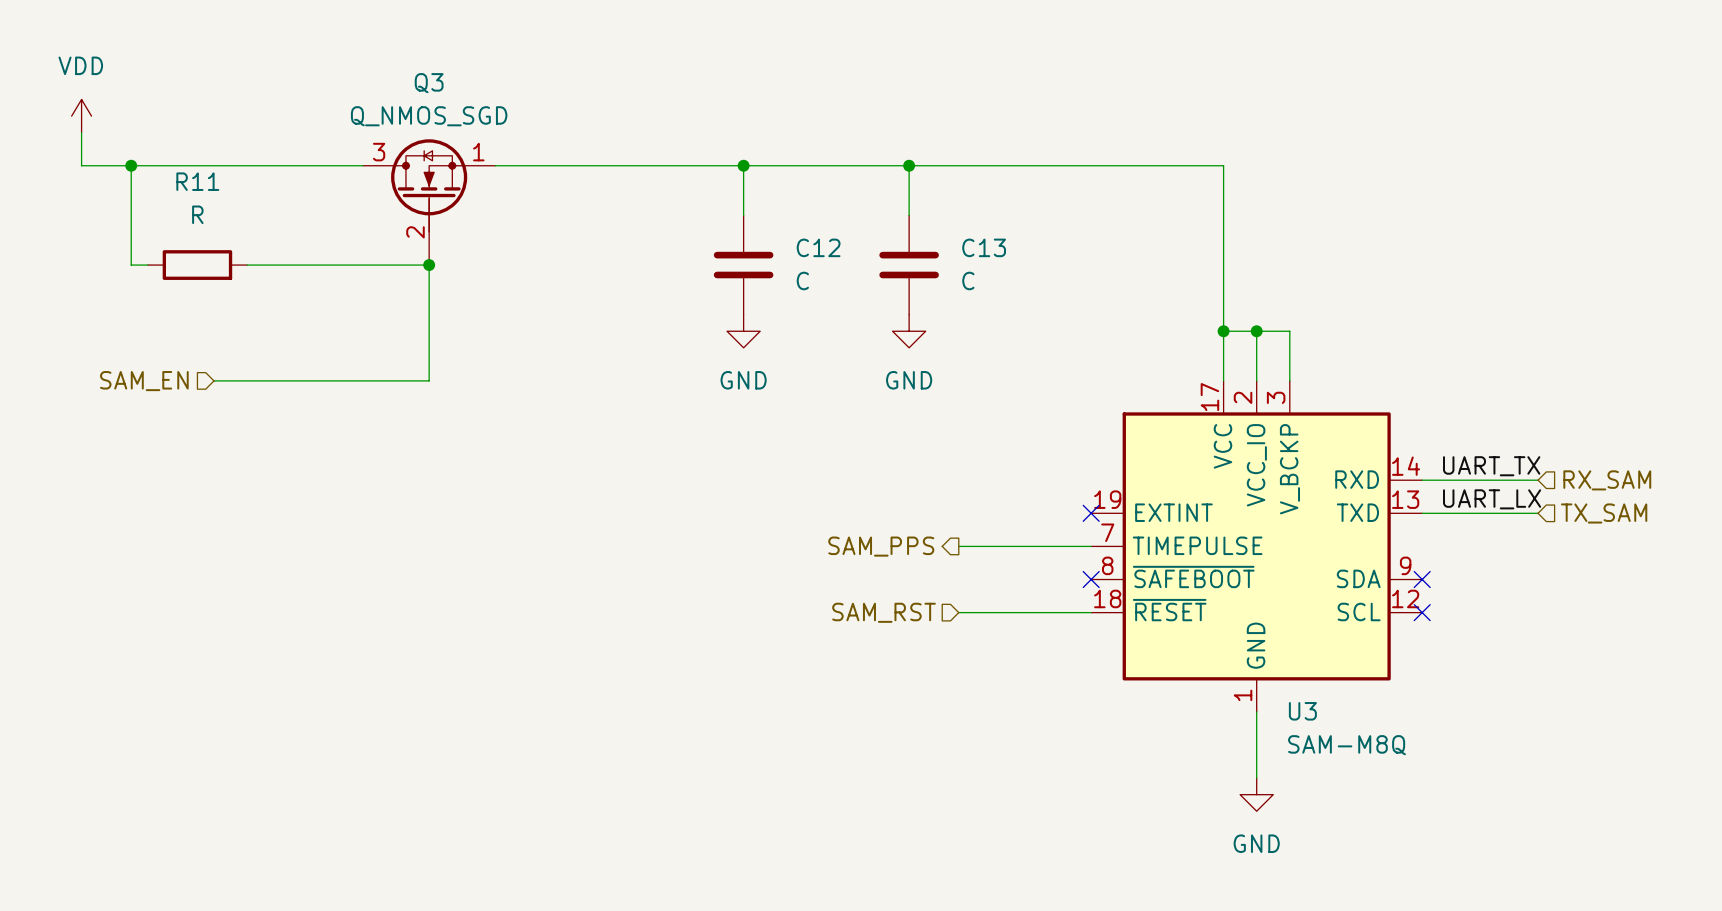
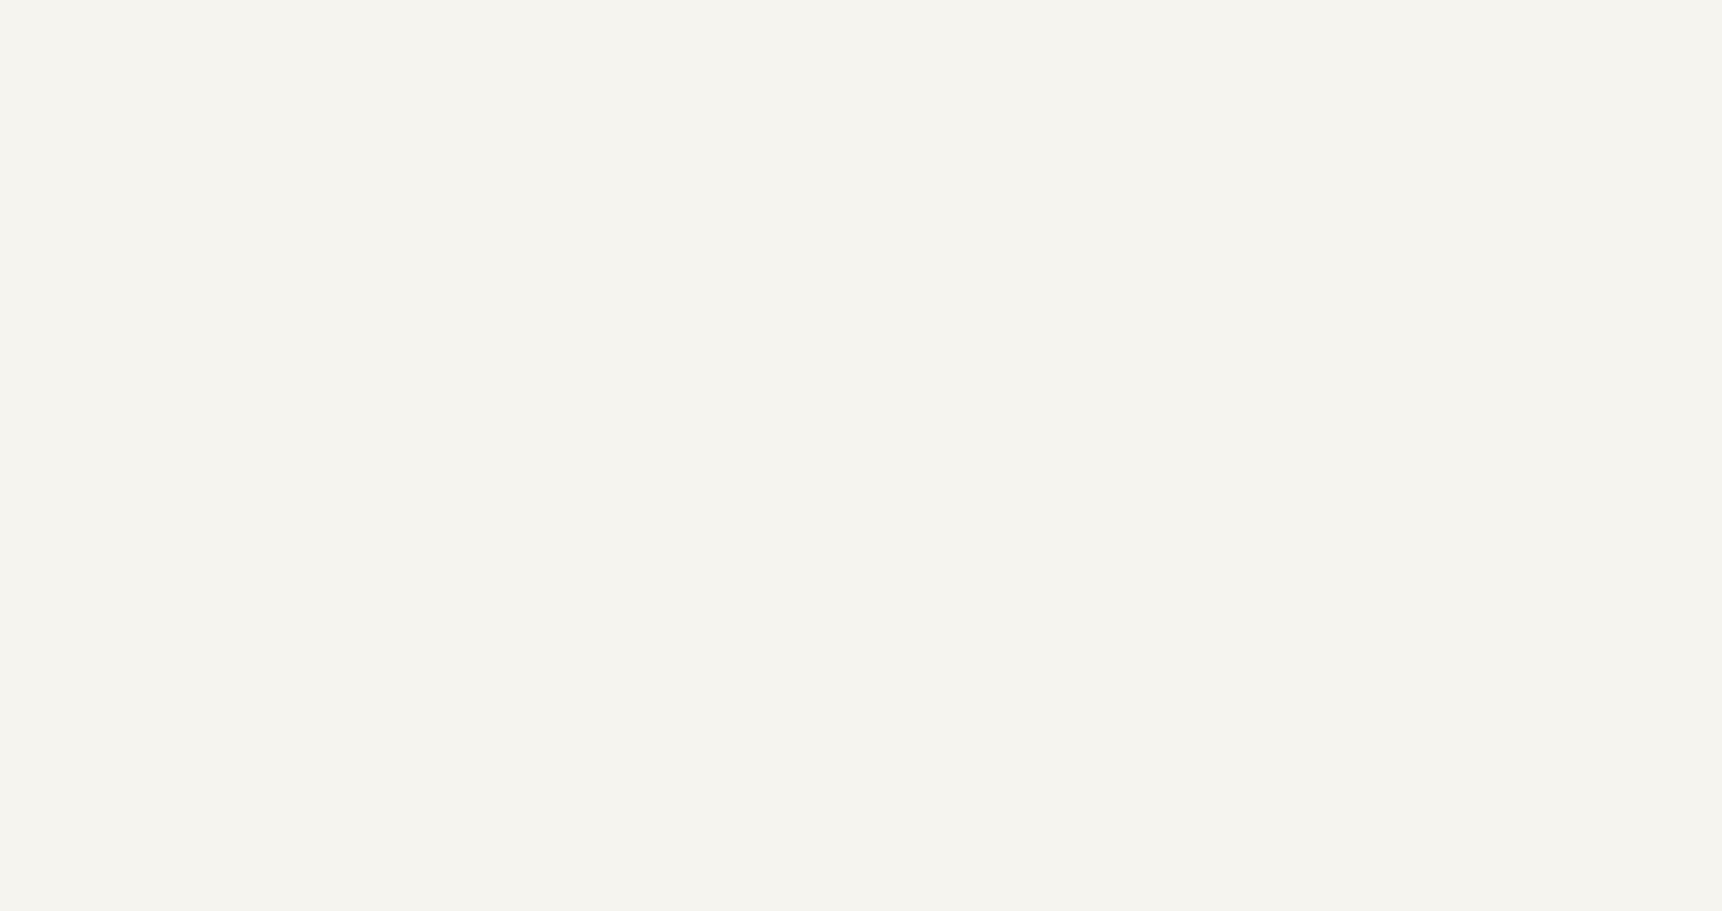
power symbol: VDD (81, 116) -> none
wire: (81, 132) (81, 165) (362, 165) -> none
wire: (131, 165) (131, 265) (147, 265) -> none
junction: (131, 165) -> none
wire: (495, 165) (1223, 165) (1223, 380) -> none
wire: (743, 165) (743, 215) -> none
junction: (743, 165) -> none
wire: (909, 165) (909, 215) -> none
junction: (909, 165) -> none
Q3: Q_NMOS_SGD (429, 202) -> none
R11: R (197, 265) -> none
wire: (247, 265) (429, 265) (429, 380) (213, 380) -> none
junction: (429, 265) -> none
C12: C (743, 265) -> none
C13: C (909, 265) -> none
power symbol: GND (743, 331) -> none
power symbol: GND (909, 331) -> none
wire: (1223, 331) (1289, 331) (1289, 380) -> none
junction: (1223, 331) -> none
wire: (1256, 331) (1256, 380) -> none
junction: (1256, 331) -> none
hierarchical label: SAM_EN (144, 381) -> none
label: UART_TX (1491, 466) -> none
wire: (1422, 480) (1538, 480) -> none
hierarchical label: RX_SAM (1607, 480) -> none
label: UART_LX (1492, 499) -> none
no-connect mark: (1091, 513) -> none
wire: (1422, 513) (1538, 513) -> none
hierarchical label: TX_SAM (1604, 513) -> none
hierarchical label: SAM_PPS (881, 546) -> none
wire: (958, 546) (1091, 546) -> none
U3: SAM-M8Q (1256, 546) -> none
no-connect mark: (1091, 579) -> none
no-connect mark: (1422, 579) -> none
hierarchical label: SAM_RST (884, 612) -> none
wire: (958, 612) (1091, 612) -> none
no-connect mark: (1422, 612) -> none
wire: (1256, 711) (1256, 778) -> none
power symbol: GND (1256, 794) -> none

